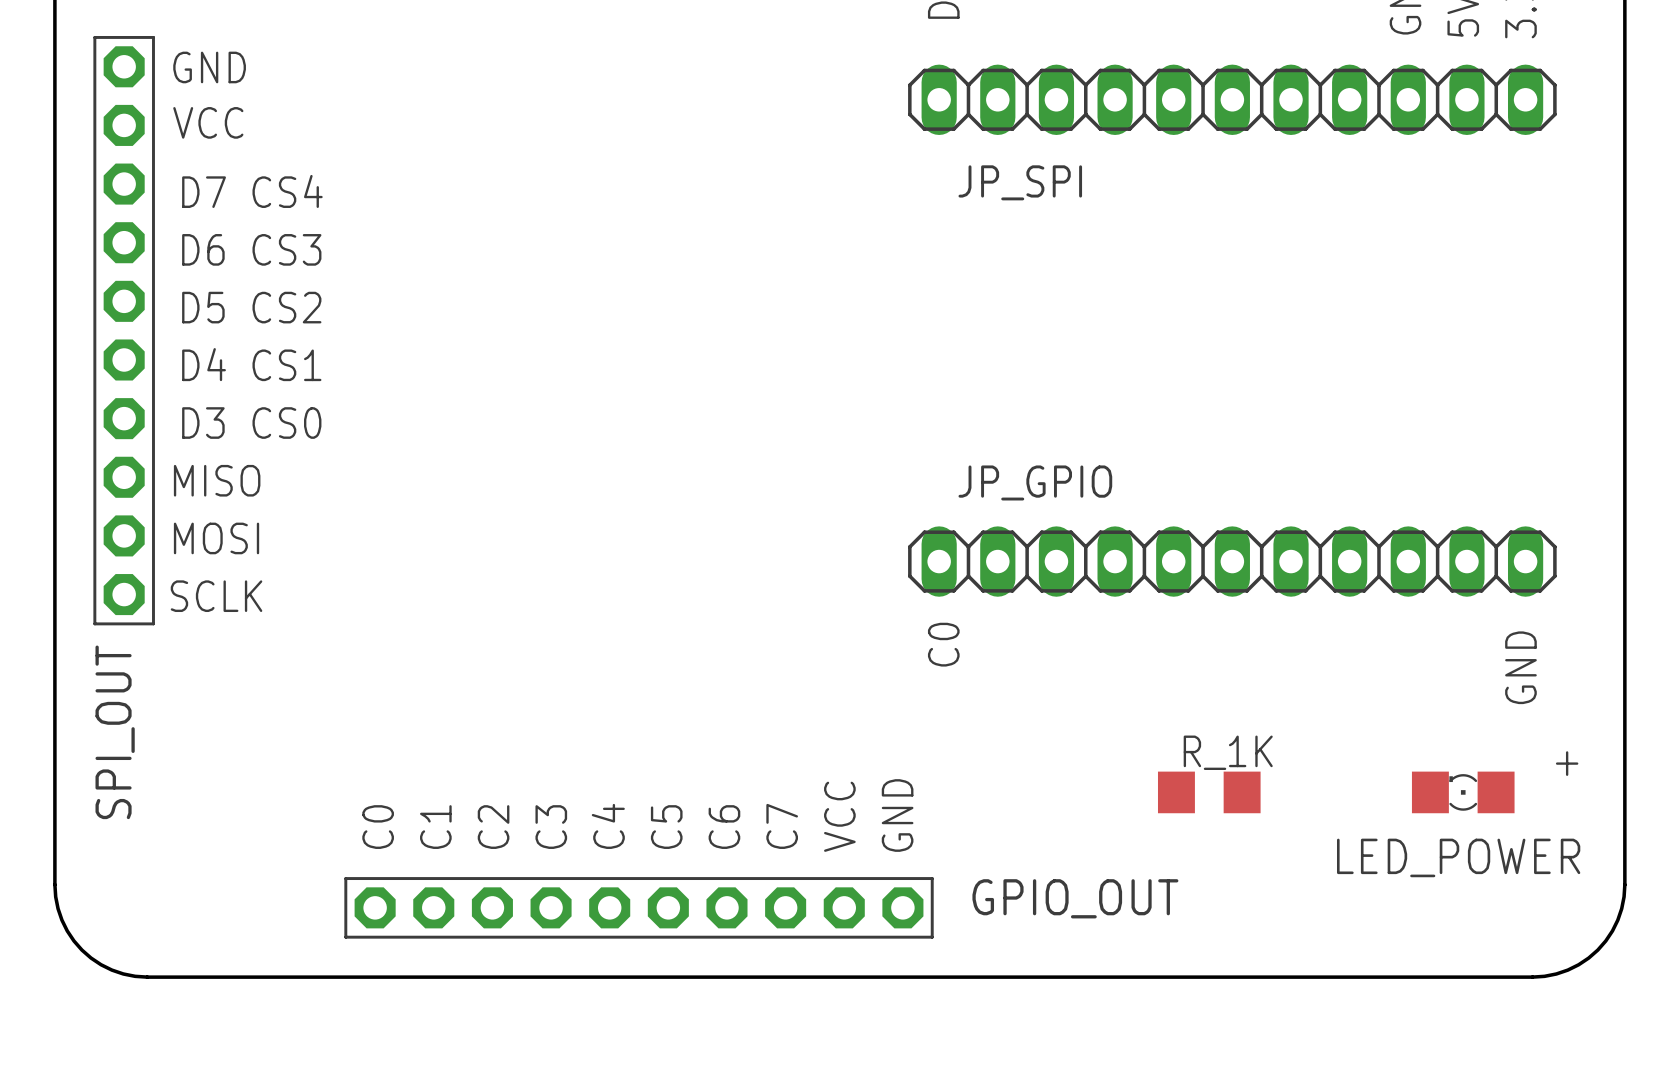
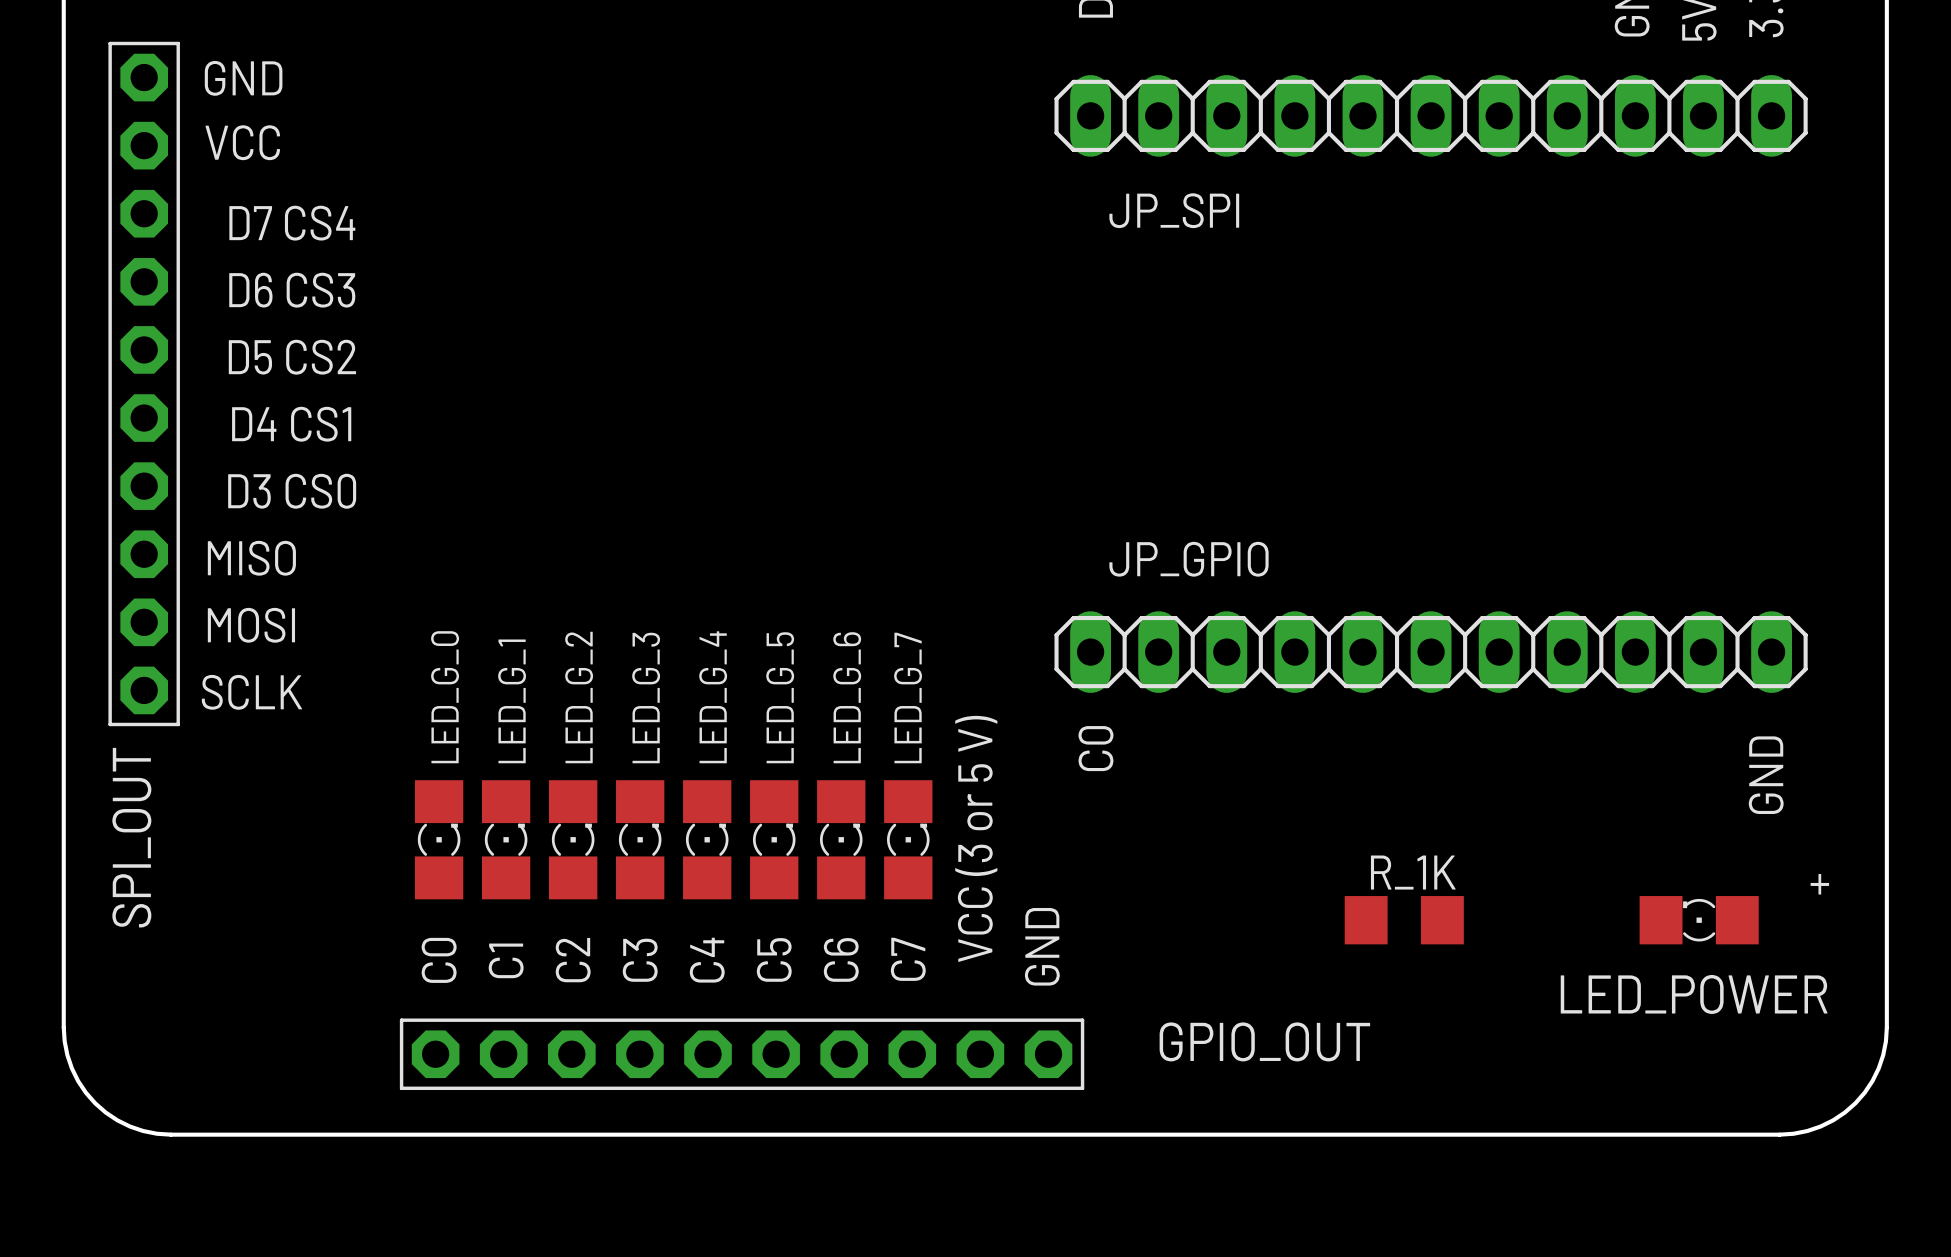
LED_G_0: none -> (439, 839)
LED_G_1: none -> (506, 839)
LED_G_2: none -> (573, 839)
LED_G_3: none -> (640, 839)
LED_G_4: none -> (707, 839)
LED_G_5: none -> (774, 839)
LED_G_6: none -> (841, 839)
LED_G_7: none -> (908, 839)
text: none -> VCC (3 or 5 V) (976, 838)
text: VCC (839, 816) -> none

